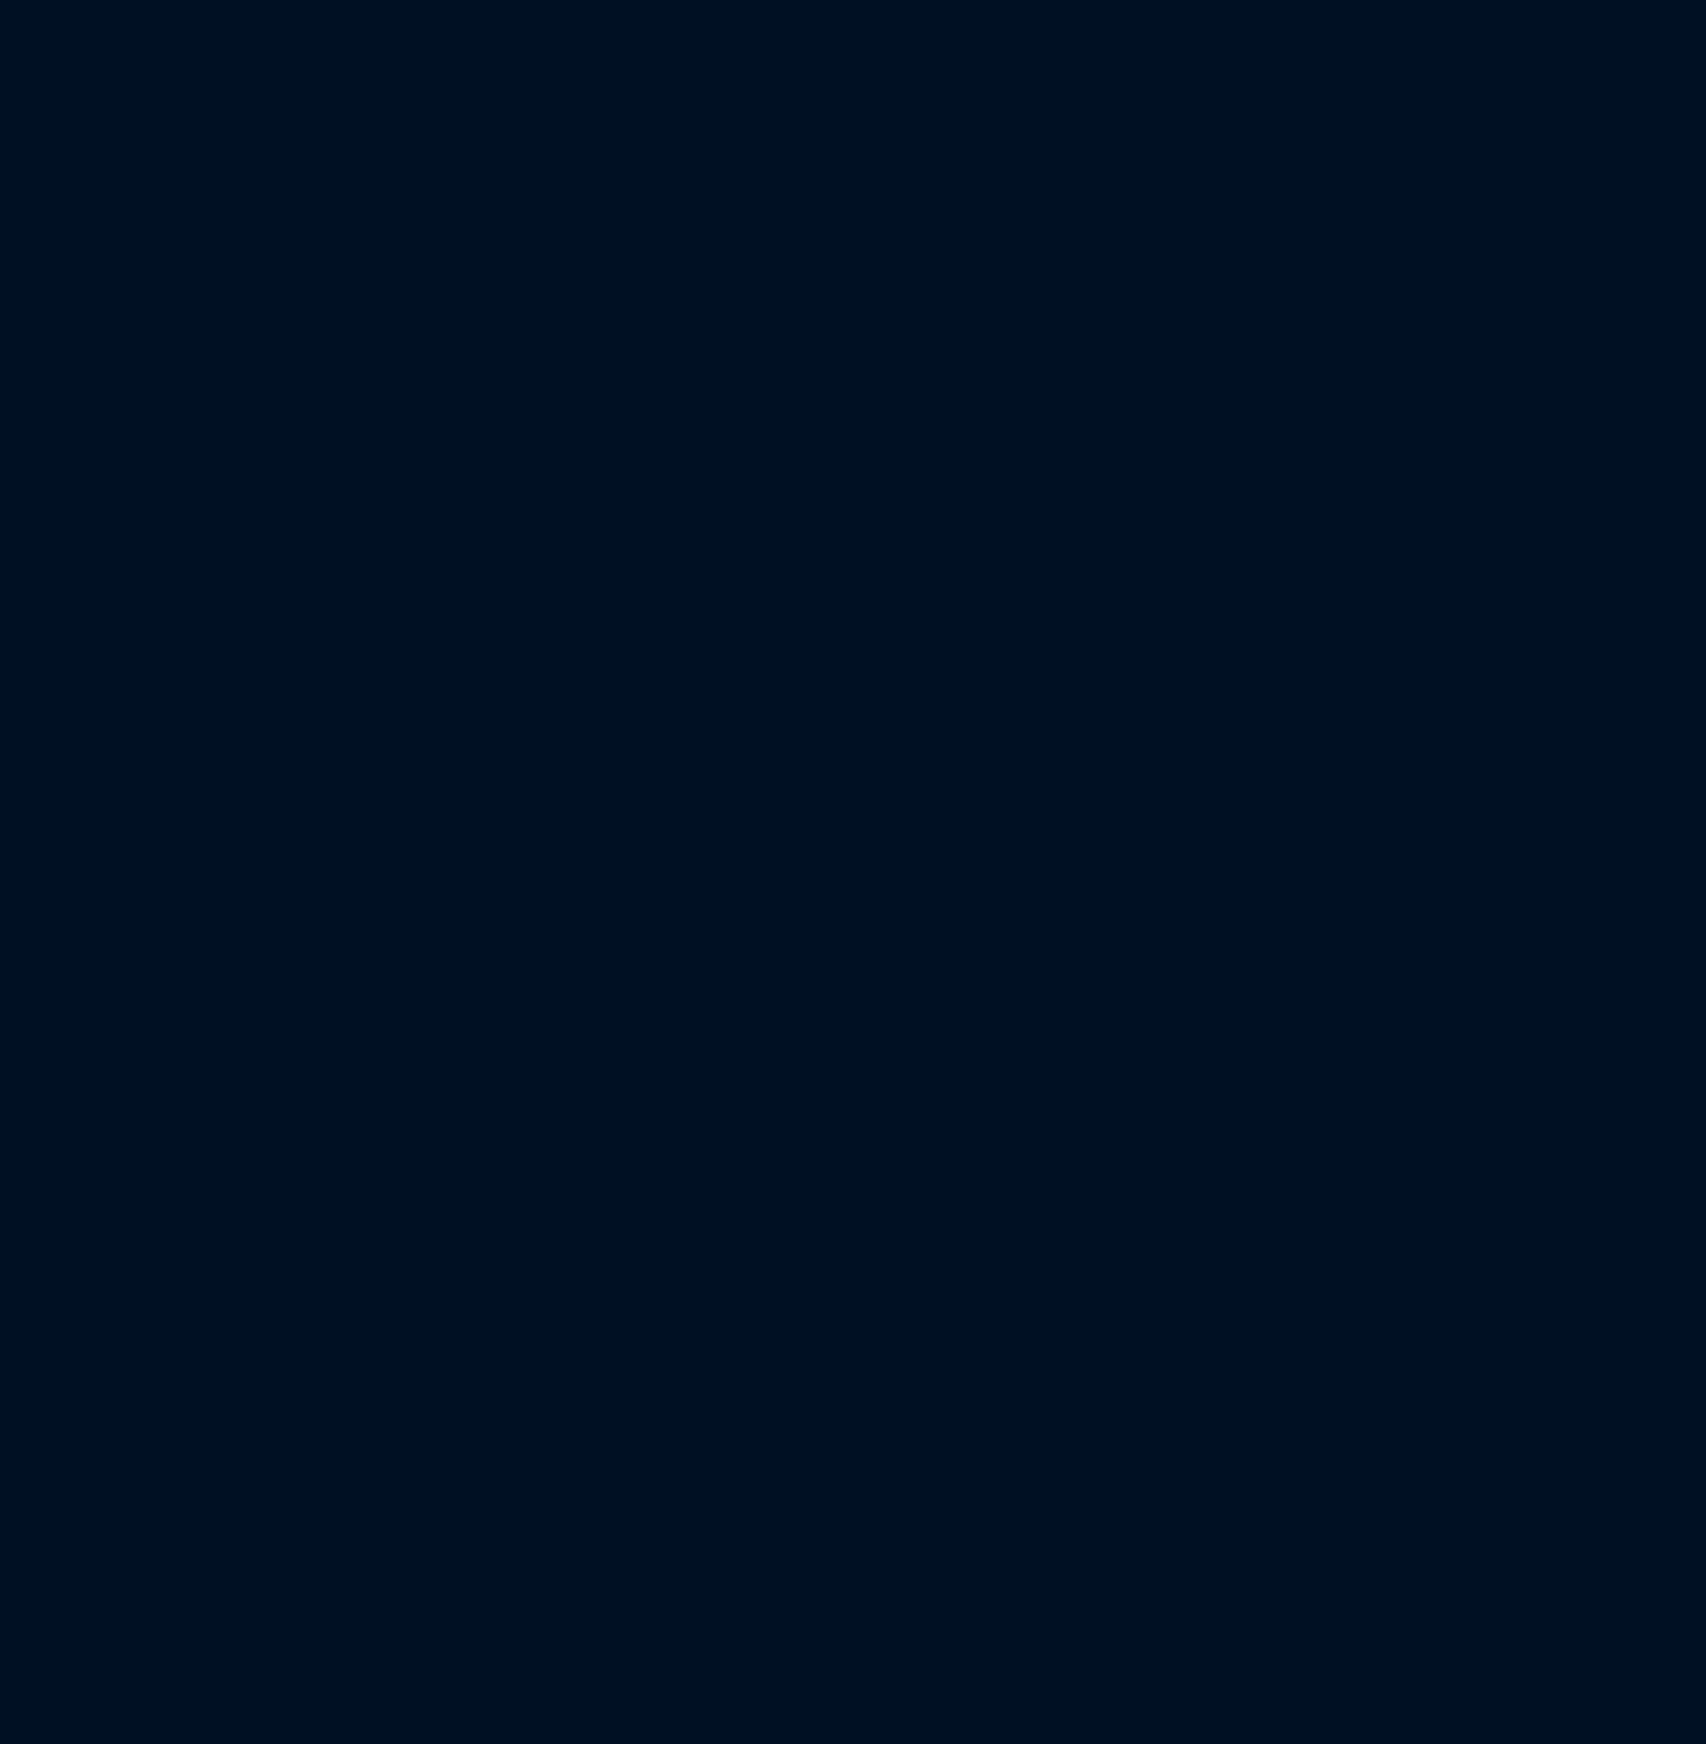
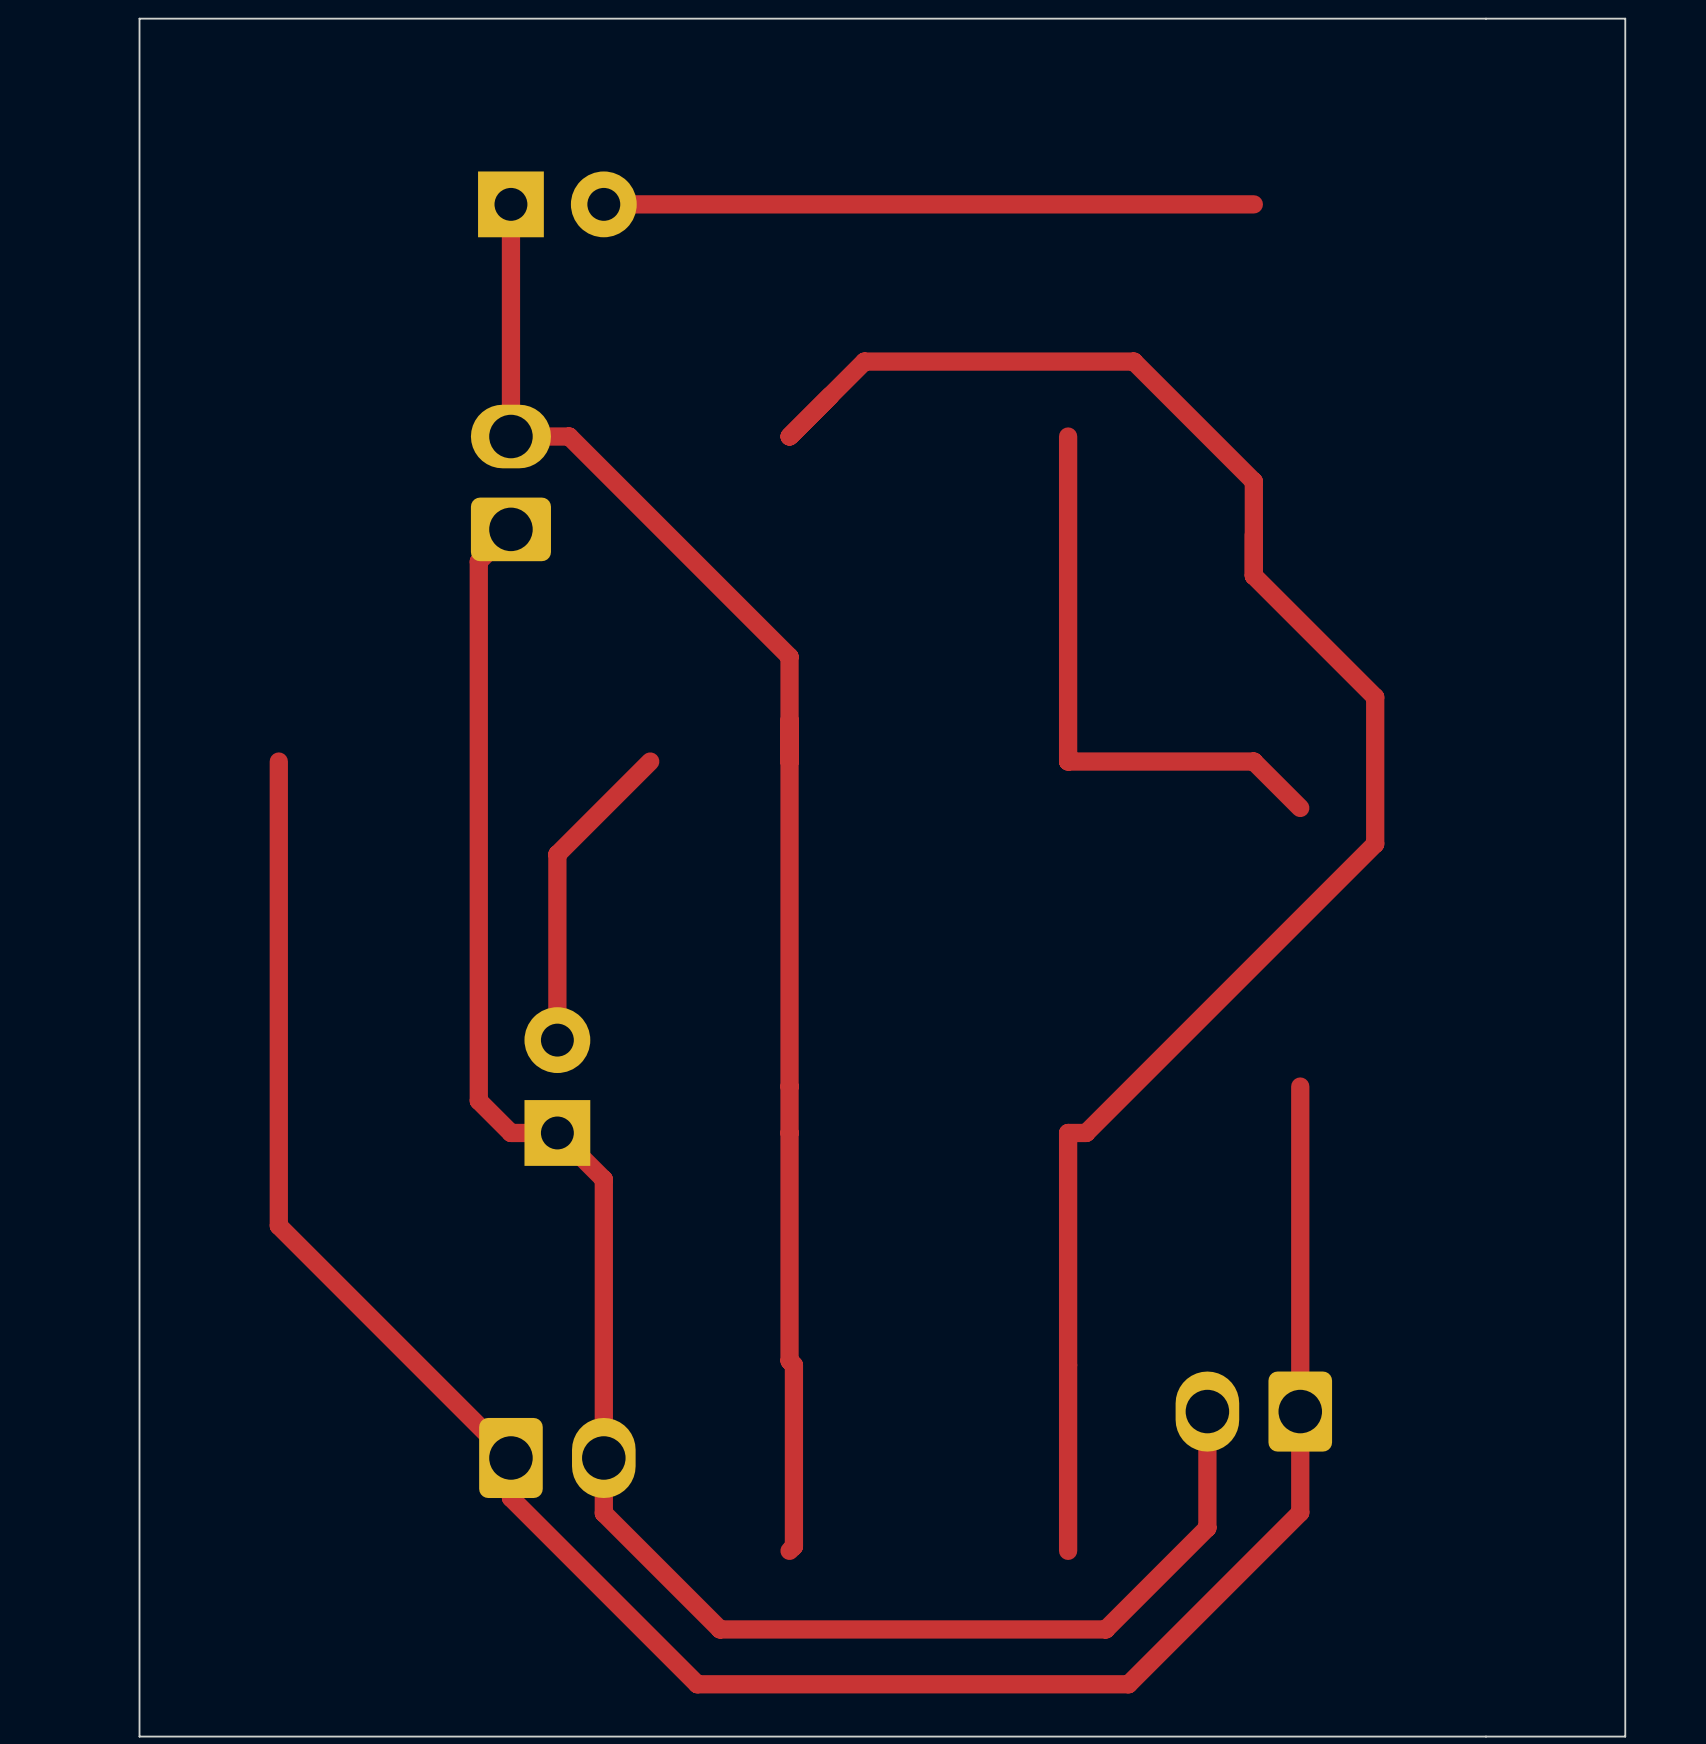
board edge: none -> (1625, 18) (1625, 1736) (139, 1736) (139, 18) (1625, 18)
top track: none -> (510, 204) (510, 441)
part: none -> (557, 204)
top track: none -> (1253, 204) (603, 204)
top track: none -> (510, 436) (569, 436) (789, 656) (789, 1360) (793, 1365) (793, 1546) (789, 1550)
top track: none -> (789, 436) (864, 361) (1133, 361) (1253, 481) (1253, 575) (1375, 697) (1375, 843) (1086, 1132) (1068, 1132) (1068, 1550)
top track: none -> (1068, 436) (1068, 761) (1253, 761) (1300, 807)
part: none -> (510, 482)
top track: none -> (510, 529) (478, 561) (478, 1100) (510, 1132) (557, 1132)
top track: none -> (278, 761) (278, 1225) (510, 1457) (510, 1497) (697, 1684) (1128, 1684) (1300, 1512) (1300, 1086)
top track: none -> (650, 761) (557, 854) (557, 1040)
part: none -> (557, 1086)
top track: none -> (557, 1132) (603, 1179) (603, 1513) (720, 1629) (1105, 1629) (1207, 1527) (1207, 1411)
part: none -> (1253, 1411)
part: none -> (557, 1457)

